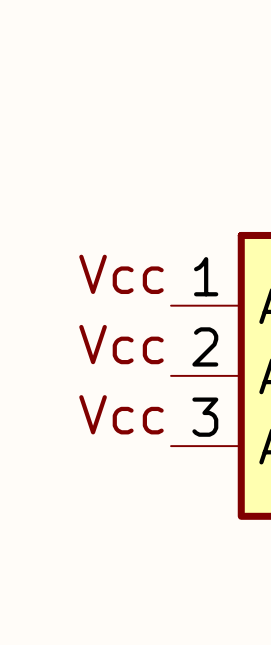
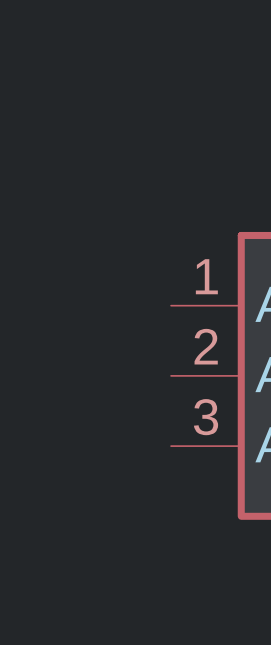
label: Vcc (121, 274) -> none
label: Vcc (121, 344) -> none
label: Vcc (121, 414) -> none

